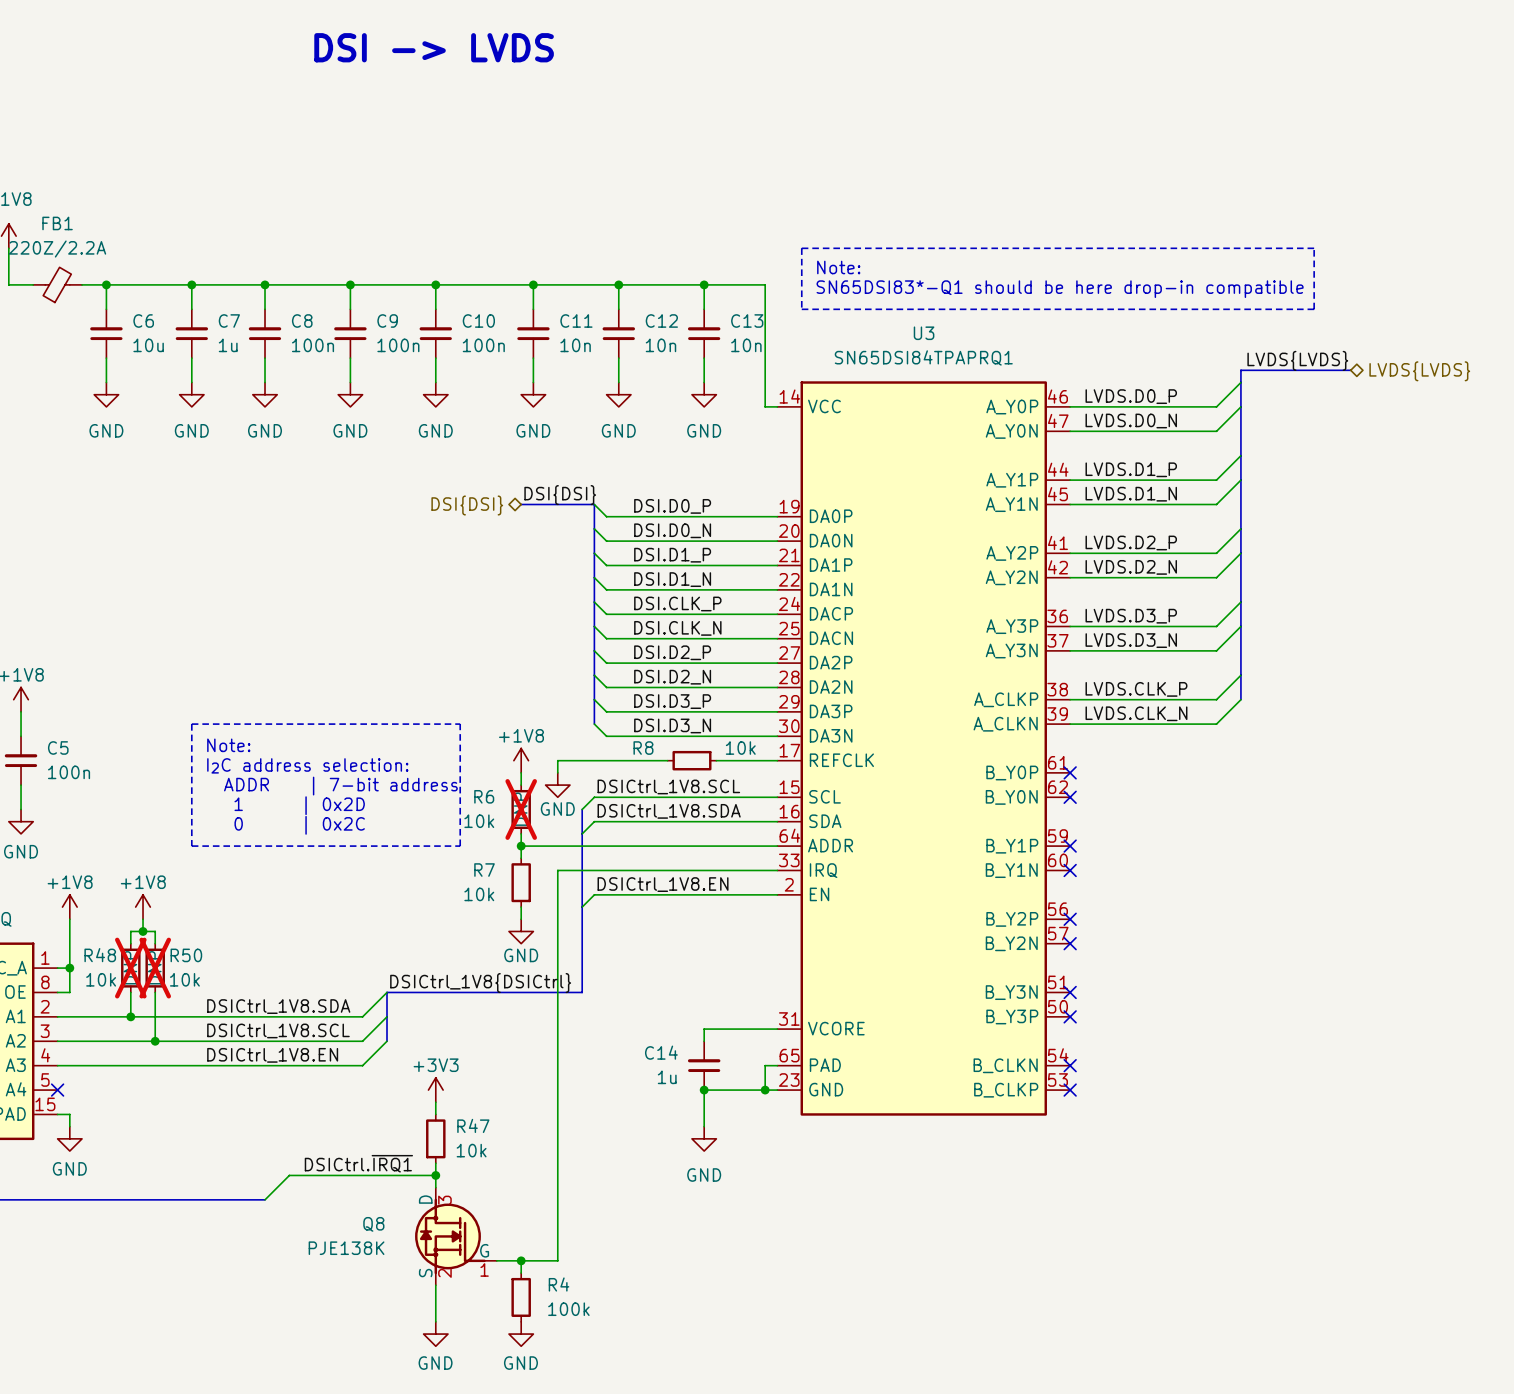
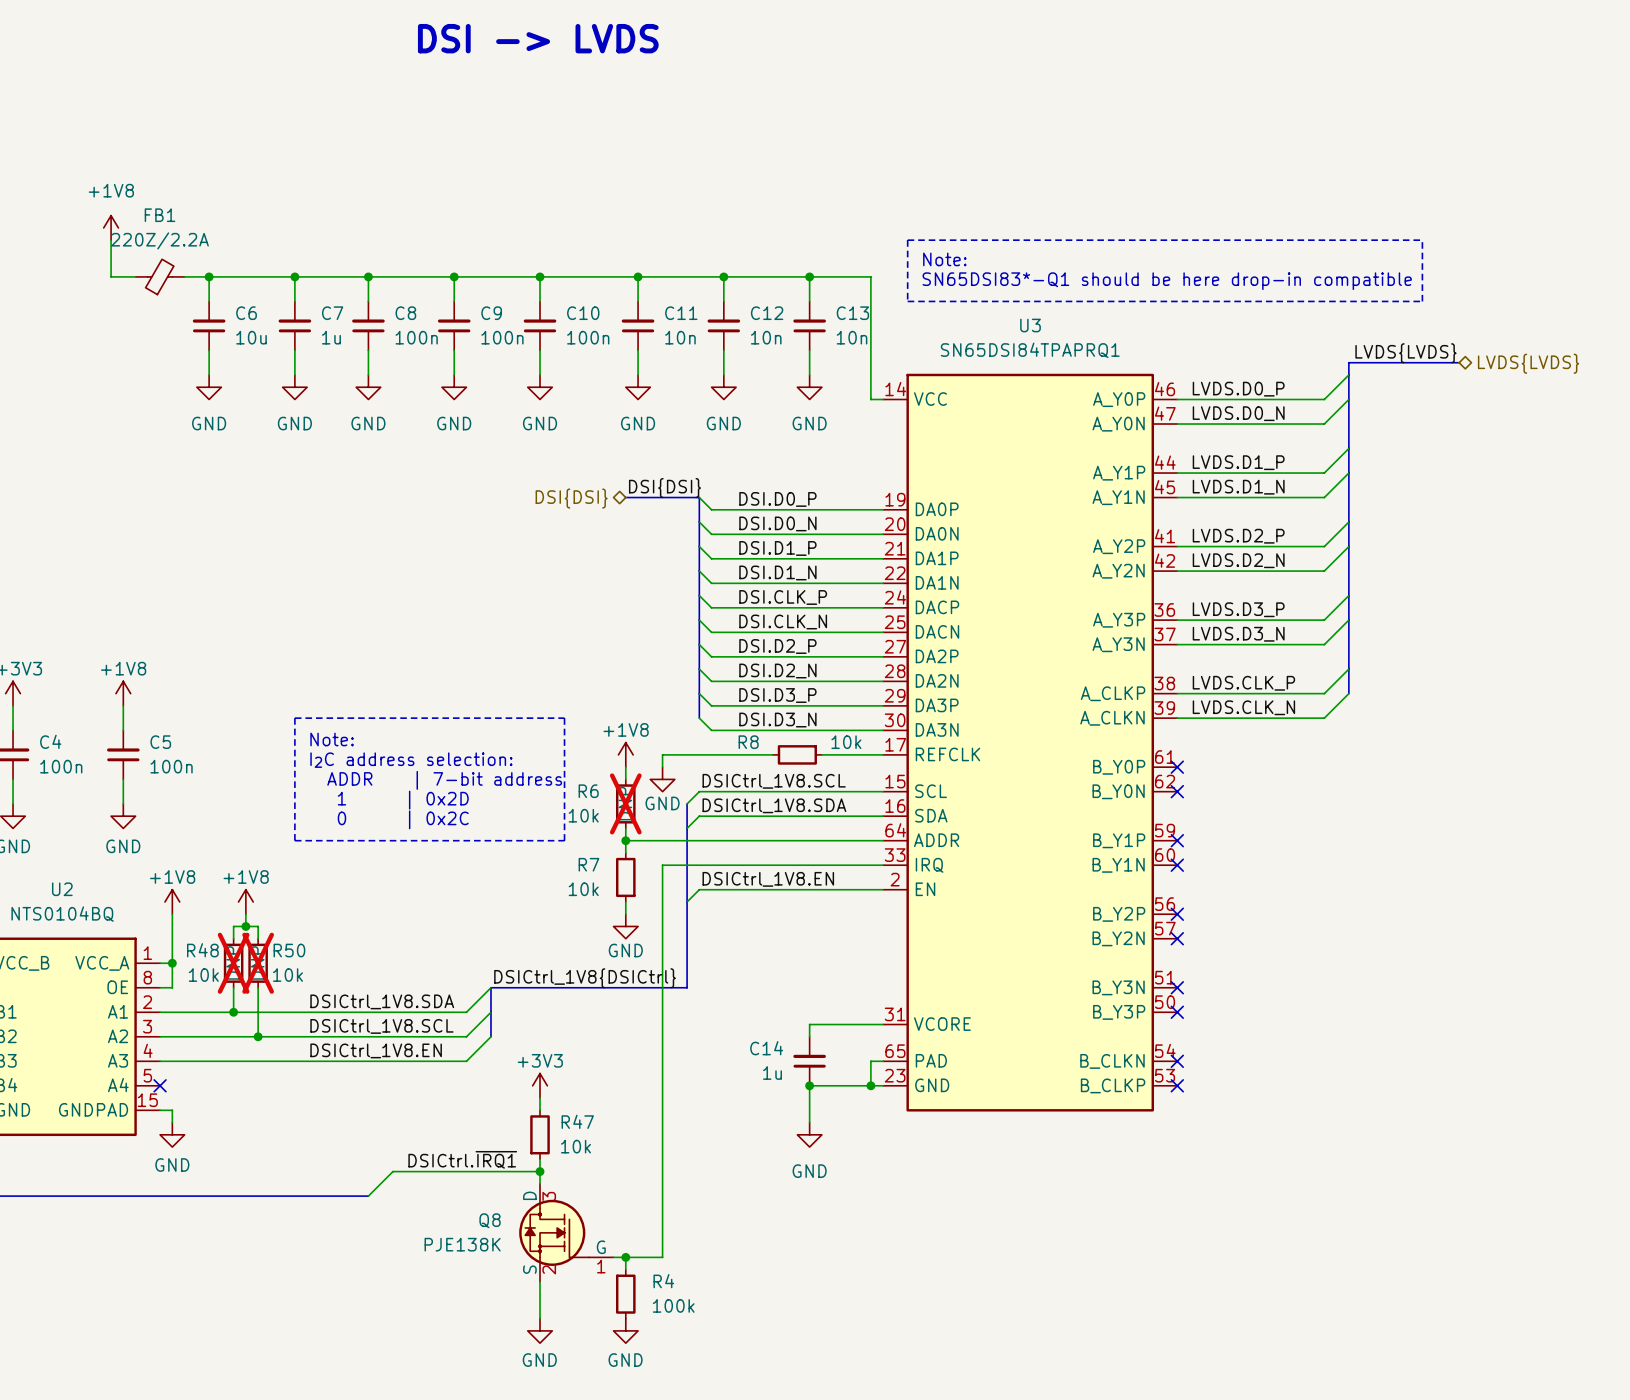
Q8 symbol: [415, 1187, 497, 1286] -> [519, 1183, 614, 1282]

